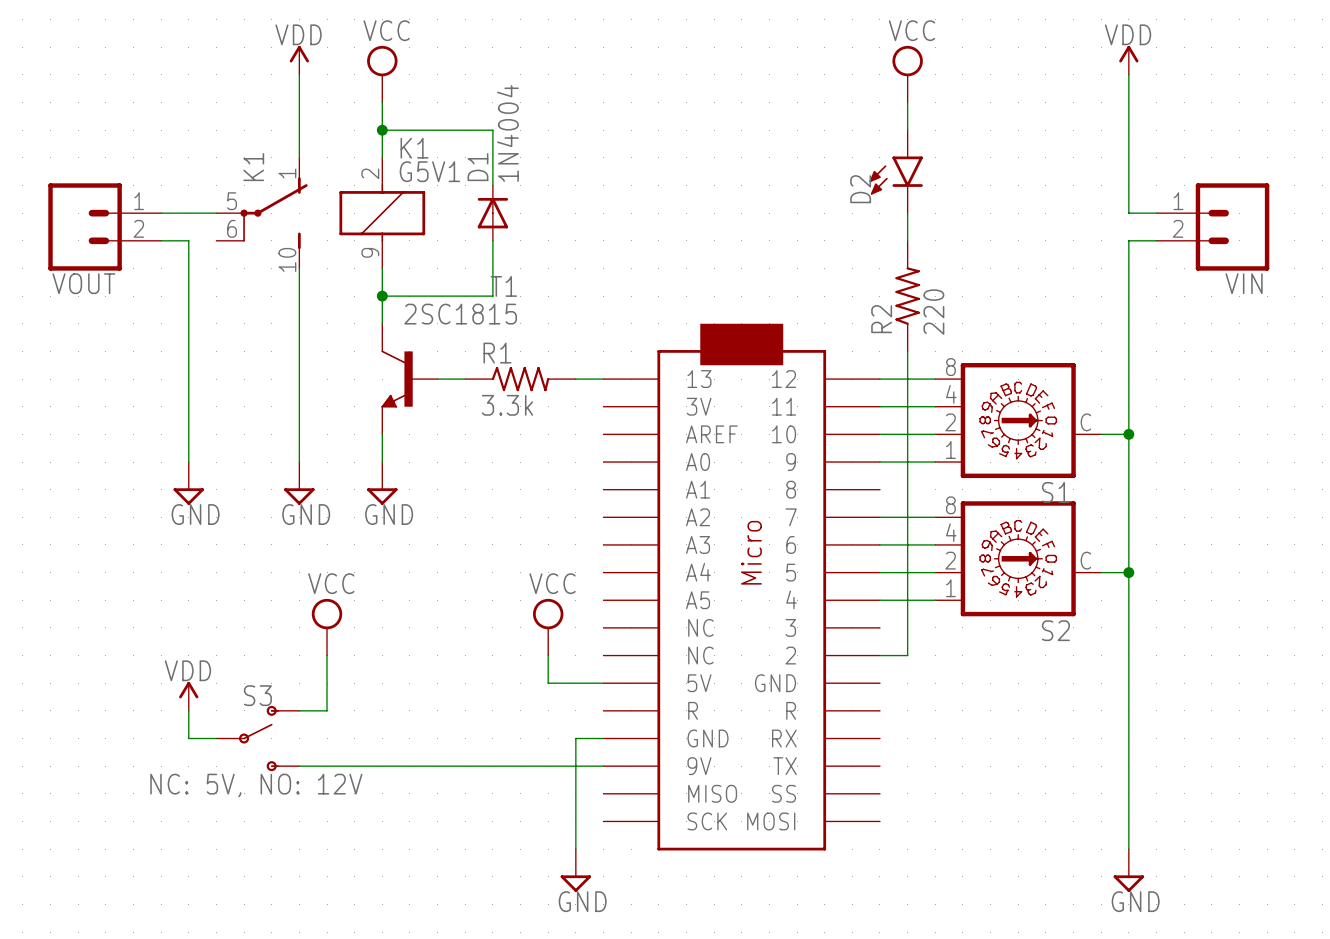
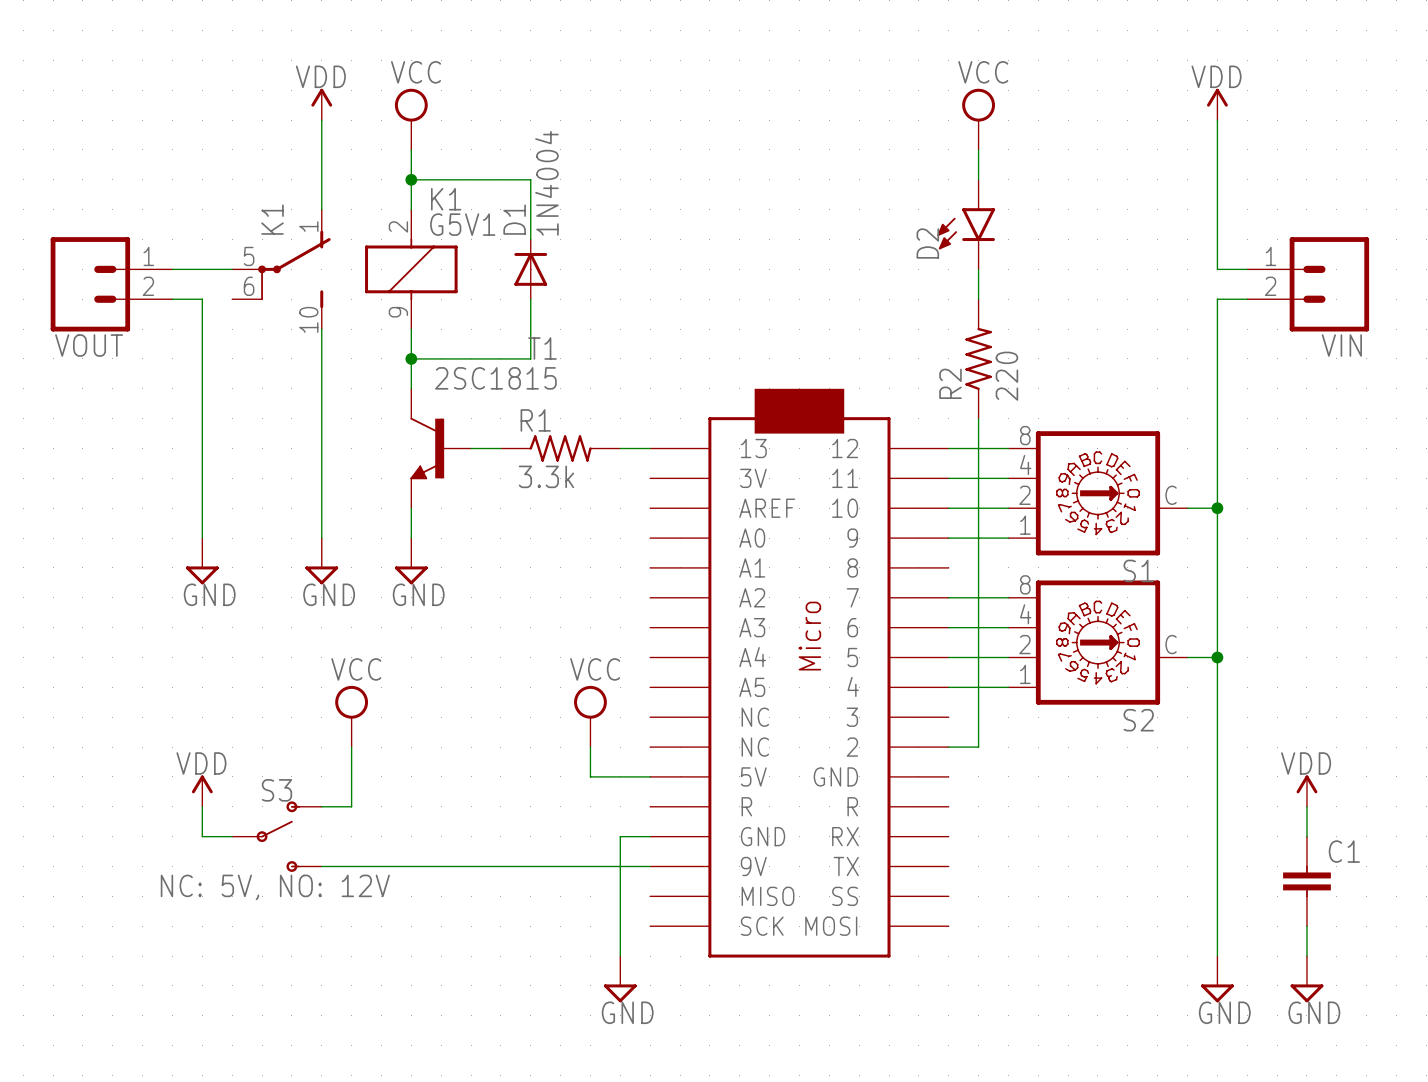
power symbol: none -> VDD (1306, 791)
wire: none -> (1306, 806) (1306, 836)
C1: none -> (1306, 881)
wire: none -> (1306, 926) (1306, 956)
power symbol: none -> GND (1306, 979)

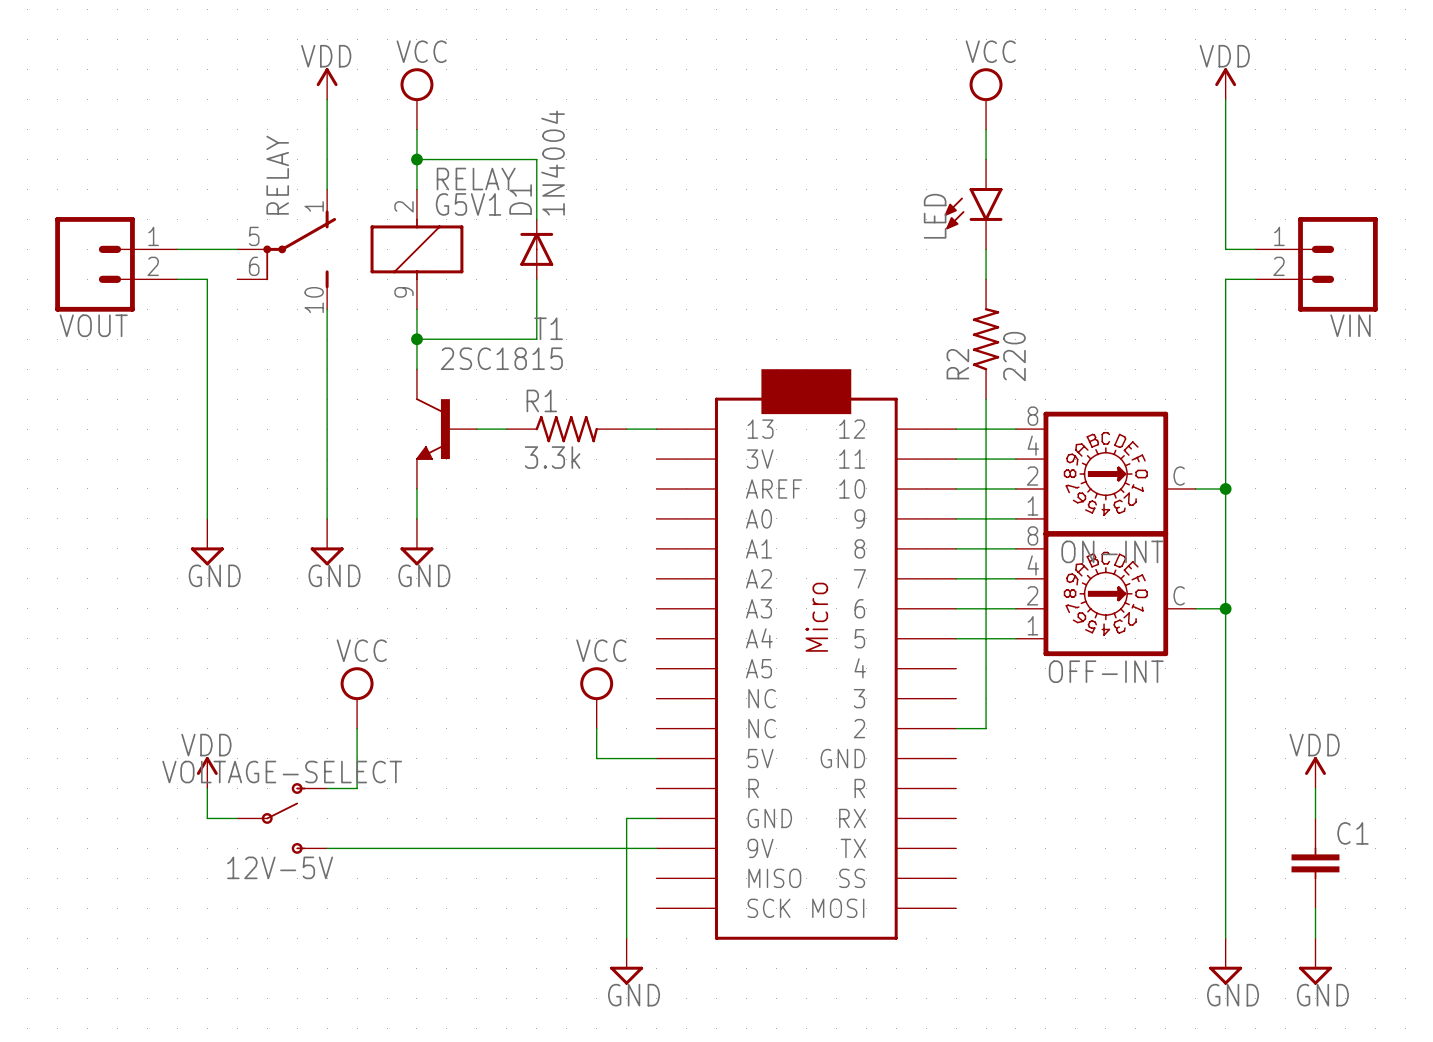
K1 name: K1 (446, 199) -> RELAY (476, 179)
K1 name: K1 (272, 219) -> RELAY (277, 175)
D2 name: D2 (927, 243) -> LED (935, 216)
S1 name: S1 (1138, 570) -> ON-INT (1112, 551)
OFF-INT: none -> (1105, 593)
S2: (1097, 642) -> none
wire: (1187, 657) (1217, 657) -> (1195, 608) (1225, 608)
junction position: (1217, 657) -> (1225, 608)
wire: (948, 687) (1008, 687) -> (956, 548) (1015, 548)
S3 name: S3 (276, 790) -> VOLTAGE-SELECT (282, 772)
S3 value: NC: 5V, NO: 12V (275, 887) -> 12V-5V (280, 867)

